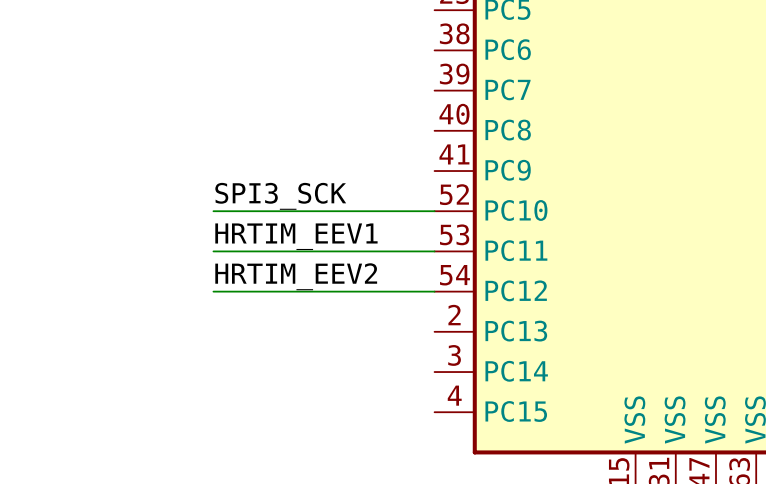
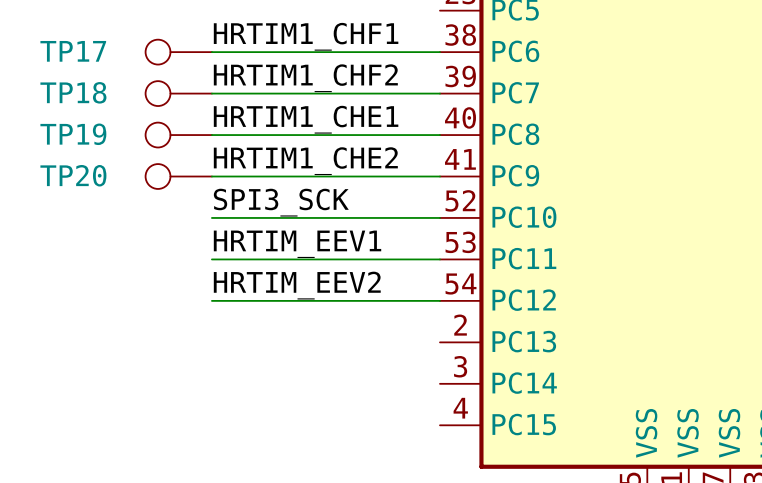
label: none -> HRTIM1_CHF1 (306, 36)
TP17: none -> (178, 52)
wire: none -> (211, 52) (439, 52)
label: none -> HRTIM1_CHF2 (305, 78)
TP18: none -> (178, 93)
wire: none -> (211, 93) (439, 93)
label: none -> HRTIM1_CHE1 (306, 119)
TP19: none -> (178, 135)
wire: none -> (211, 135) (439, 135)
label: none -> HRTIM1_CHE2 (305, 161)
TP20: none -> (178, 176)
wire: none -> (211, 176) (439, 176)

